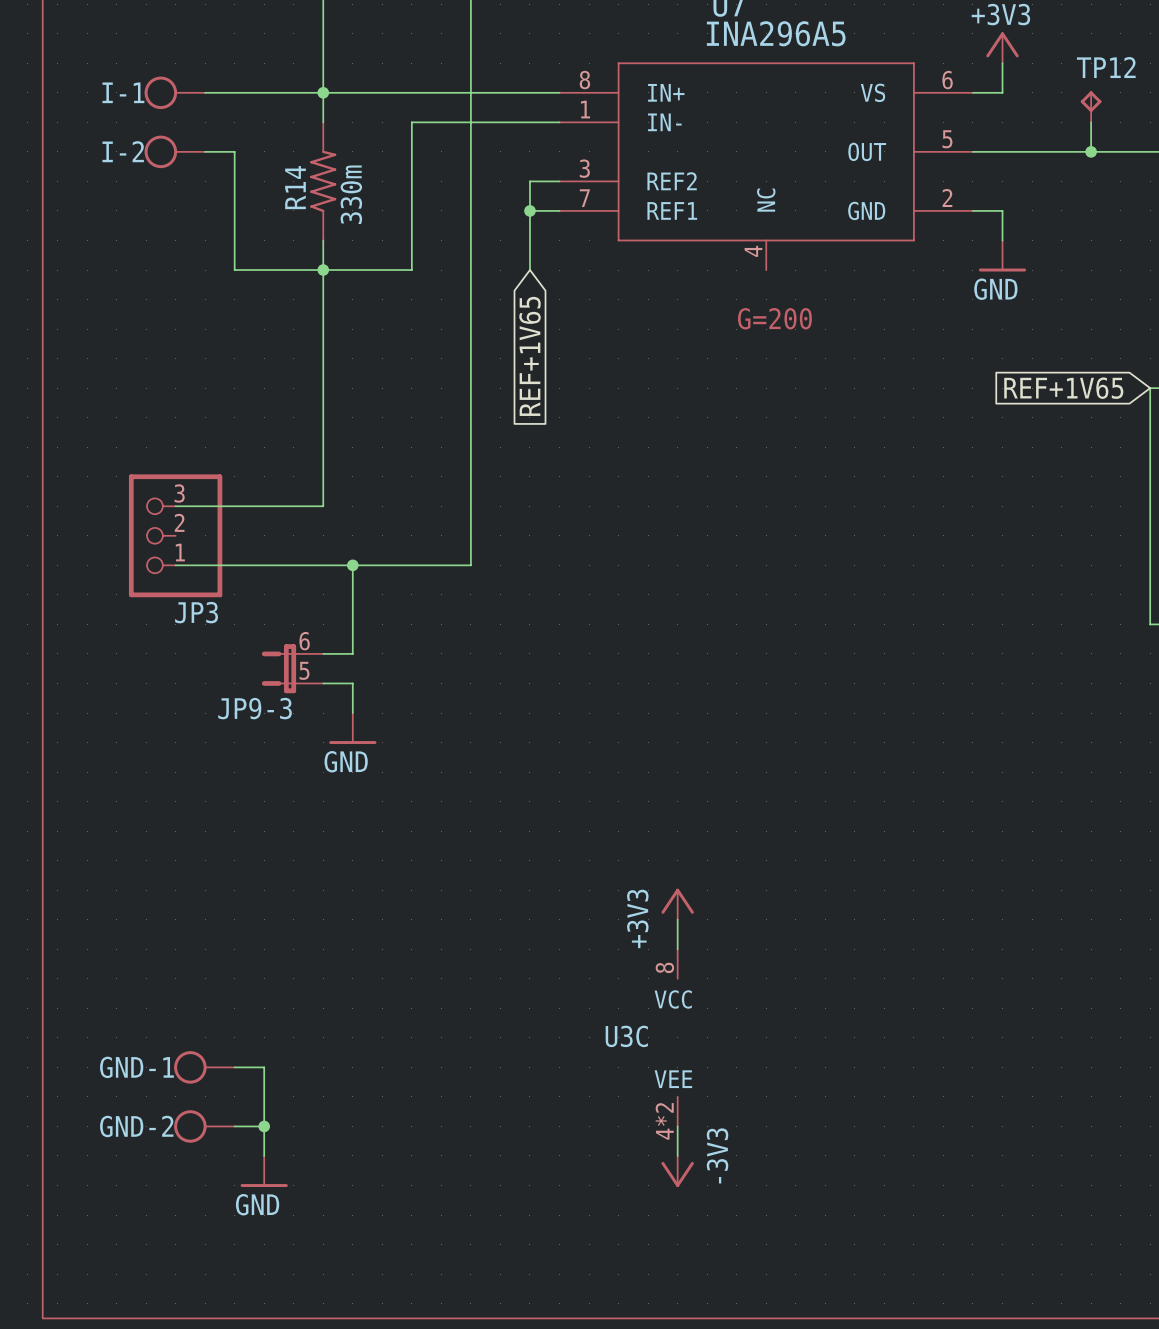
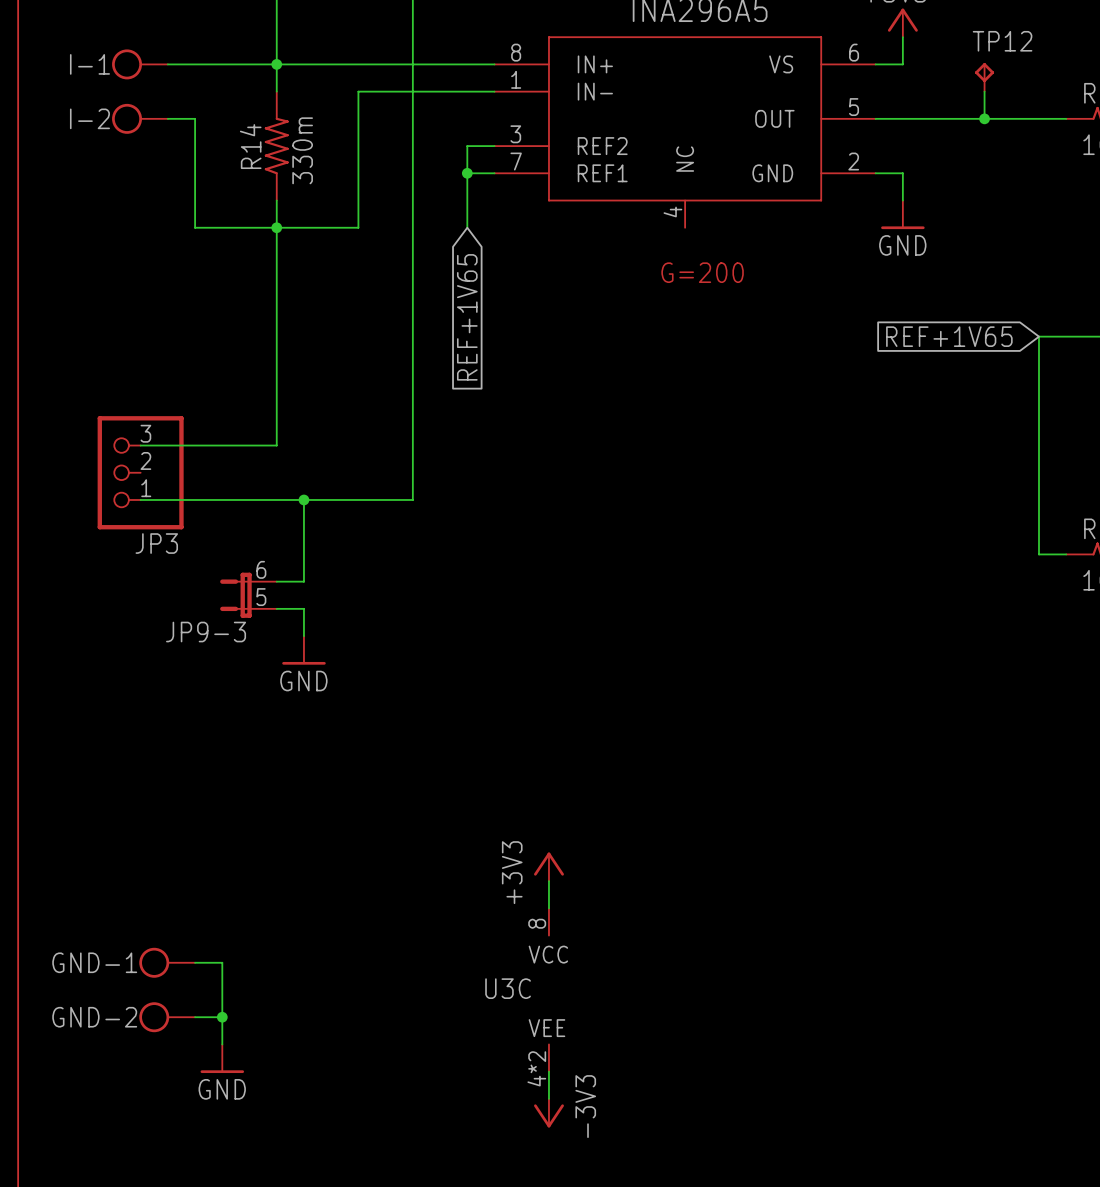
power symbol position: +3V3 (677, 904) -> +3V3 (548, 866)
wire: (677, 919) (677, 949) -> (548, 881) (548, 908)
U3C position: (677, 1037) -> (548, 990)
wire: (677, 1126) (677, 1155) -> (548, 1071) (548, 1098)
power symbol position: -3V3 (677, 1171) -> -3V3 (548, 1113)

